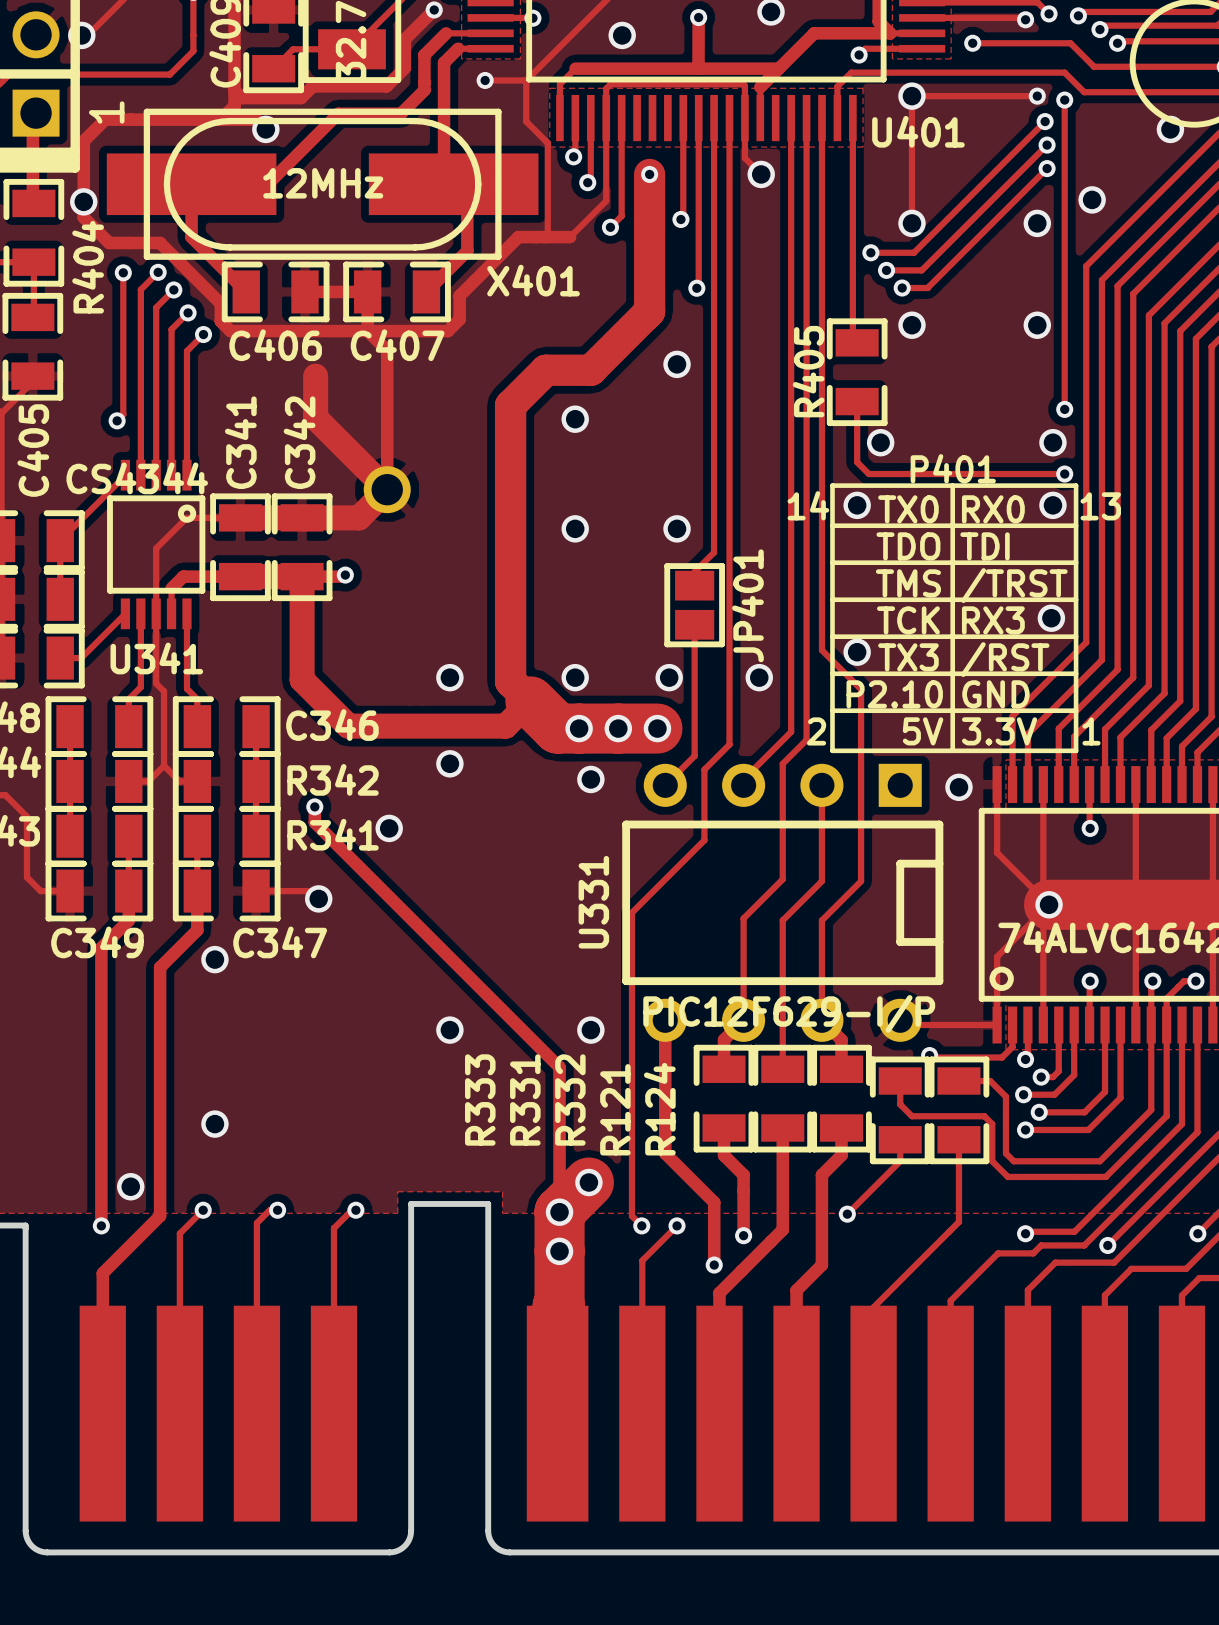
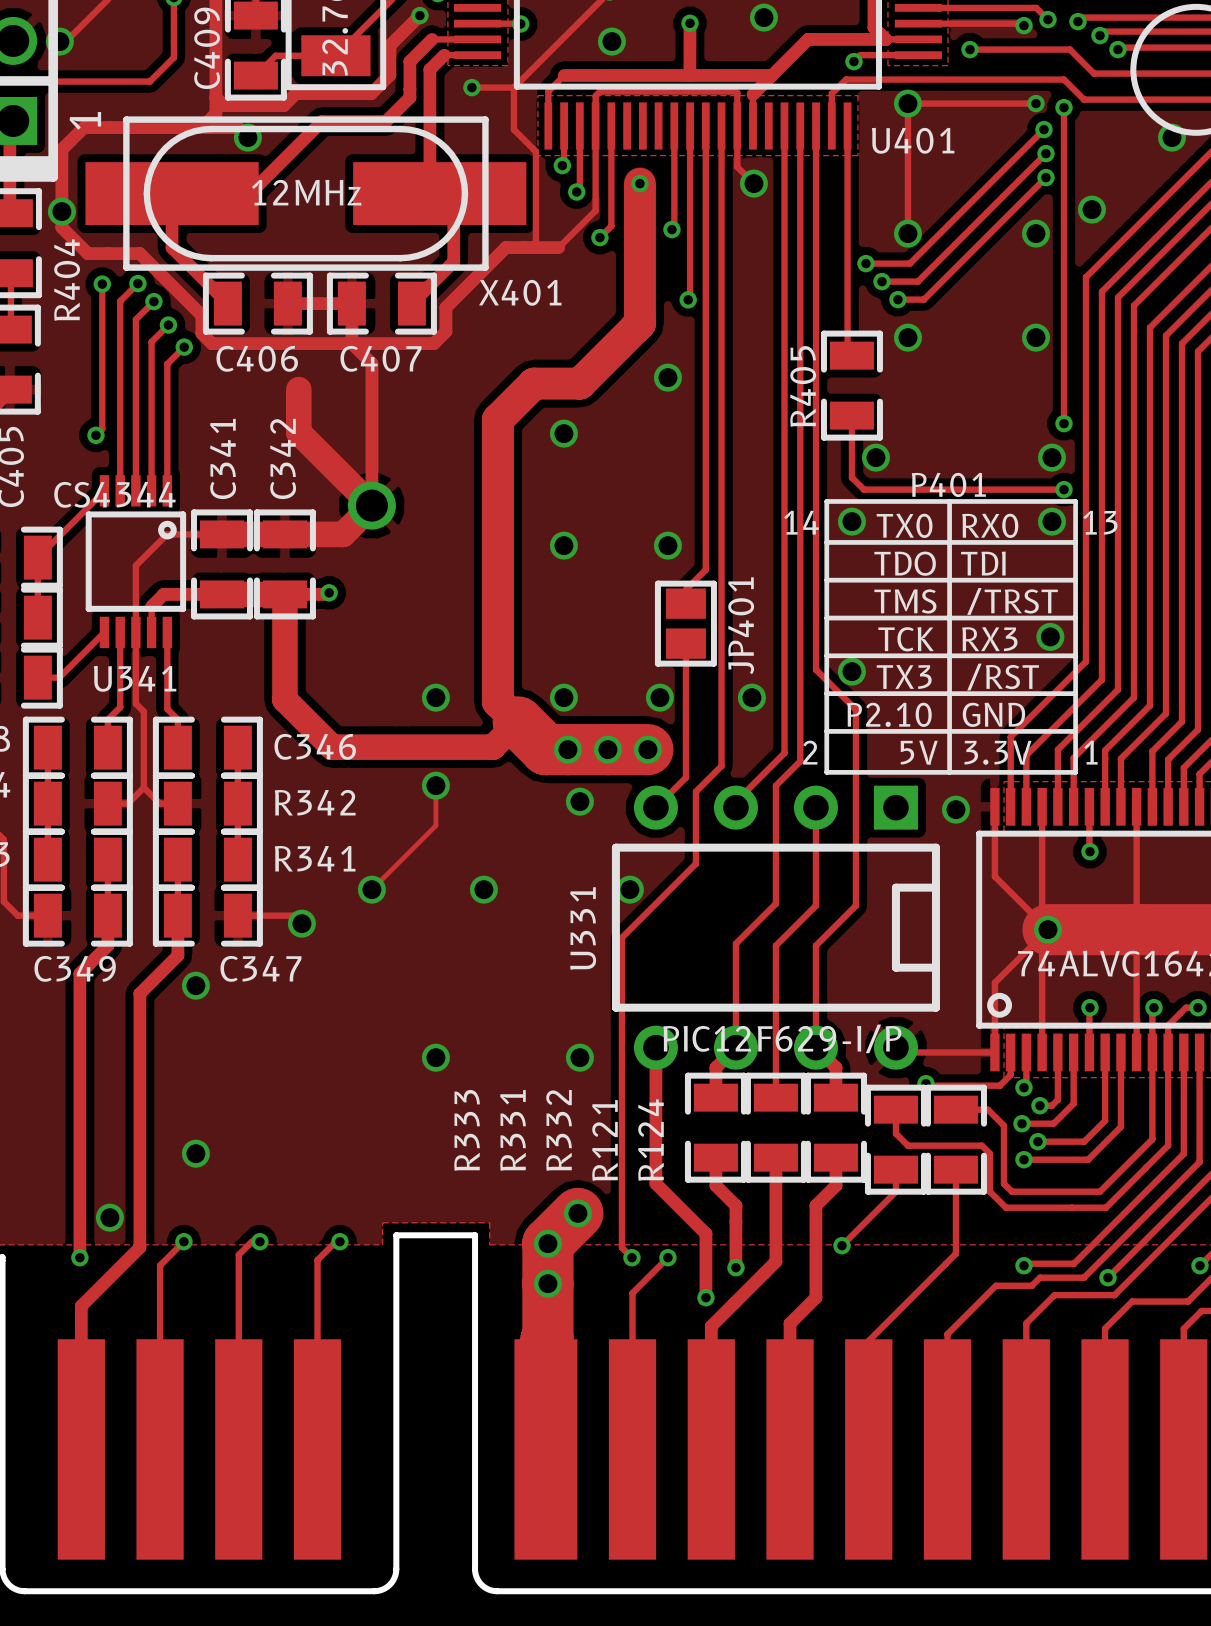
track: none -> (435, 789) (435, 825) (371, 889)
track: (314, 806) (314, 822) (559, 1067) (559, 1212) -> none
via: (314, 806) -> none
via position: (389, 828) -> (371, 889)
via: none -> (483, 889)
via: none -> (629, 889)

